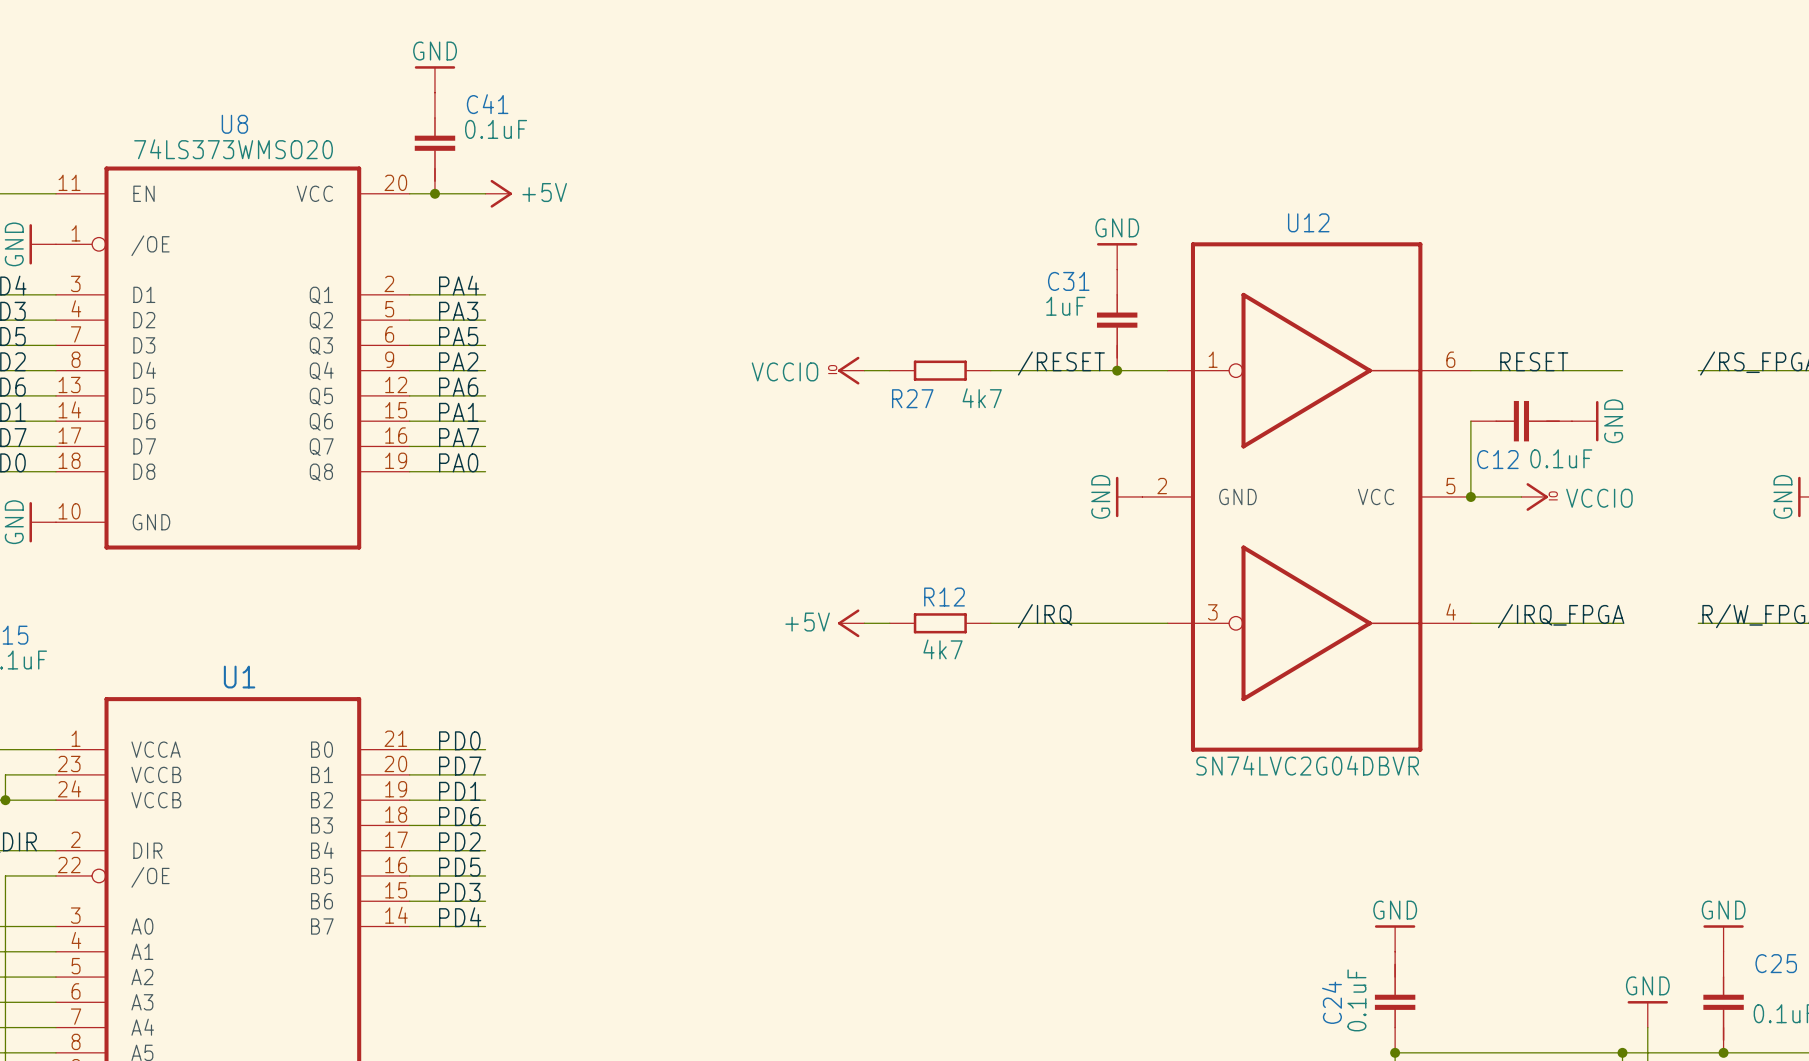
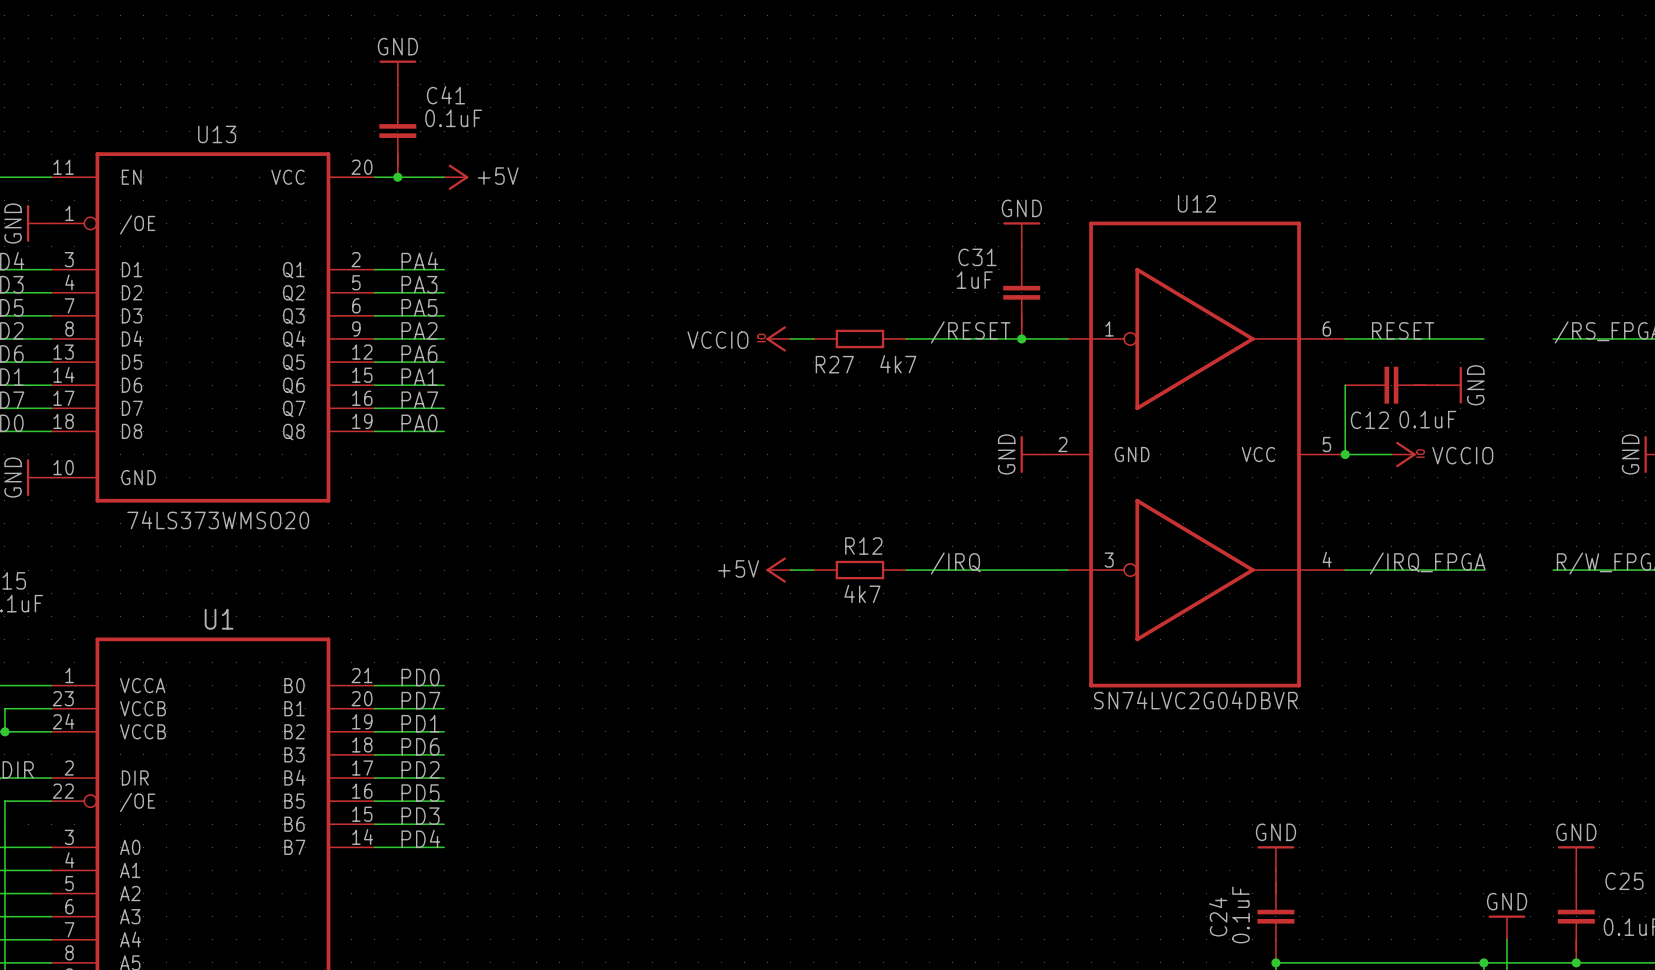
U8 name: U8 (234, 124) -> U13 (217, 134)
U8 value position: 74LS373WMSO20 (233, 149) -> 74LS373WMSO20 (218, 520)

